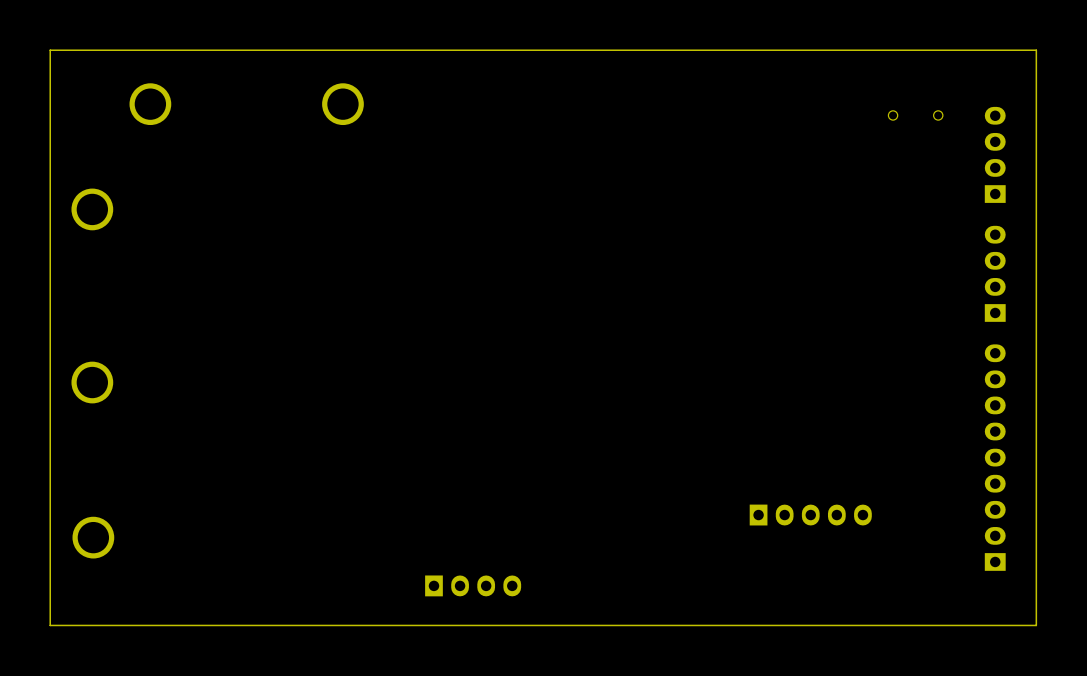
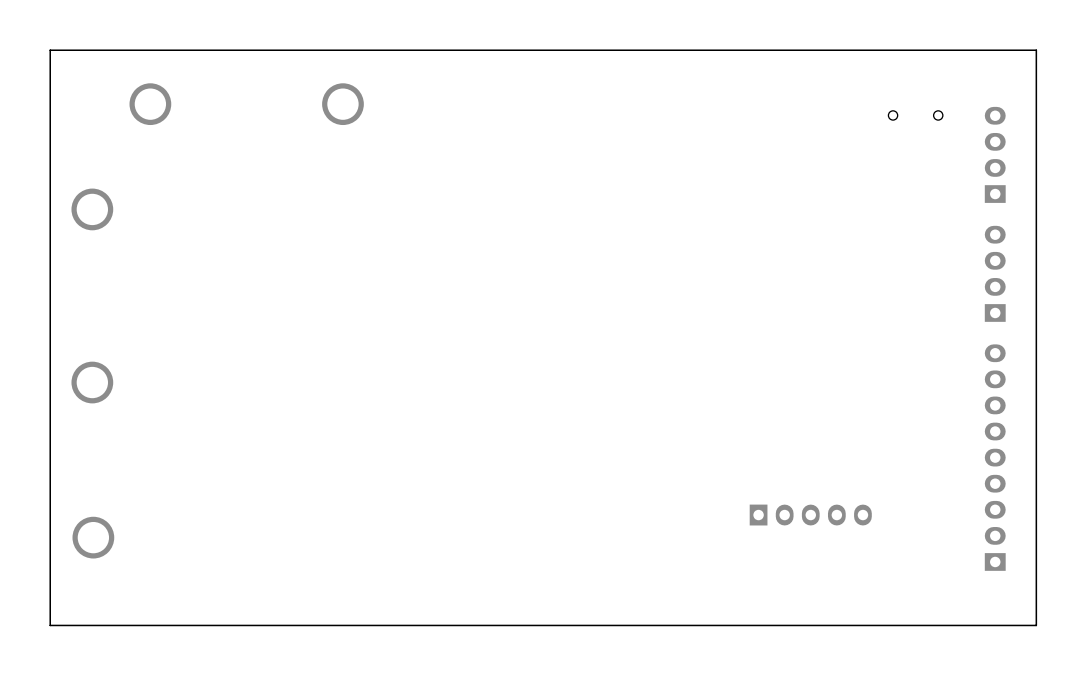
part: (473, 585) -> none

